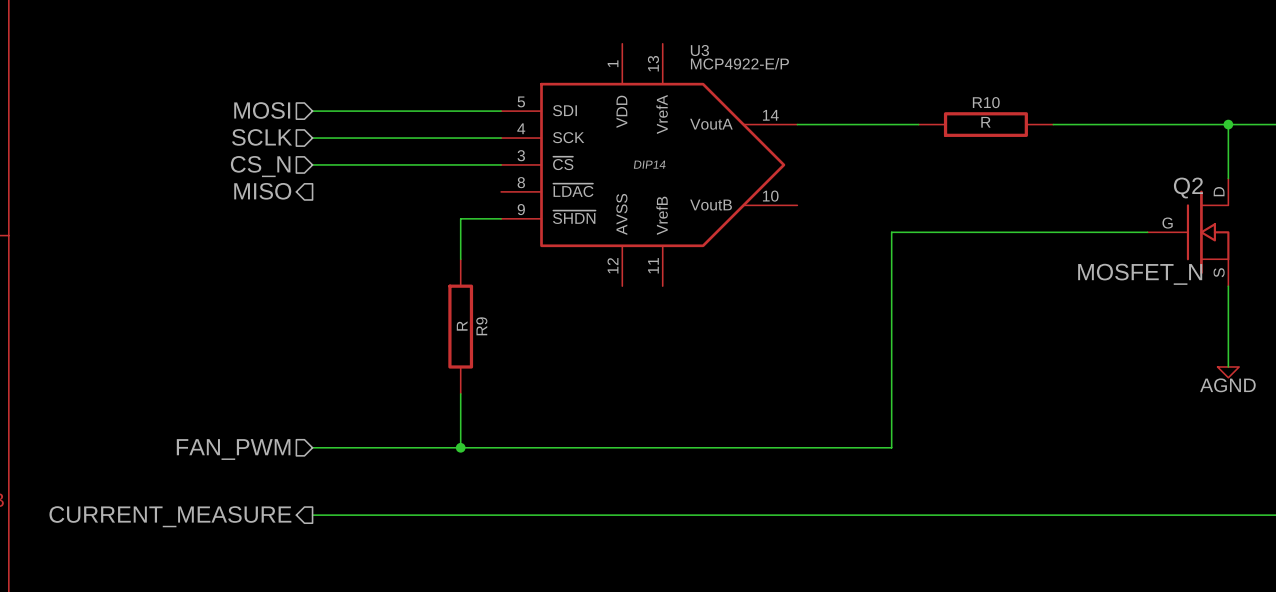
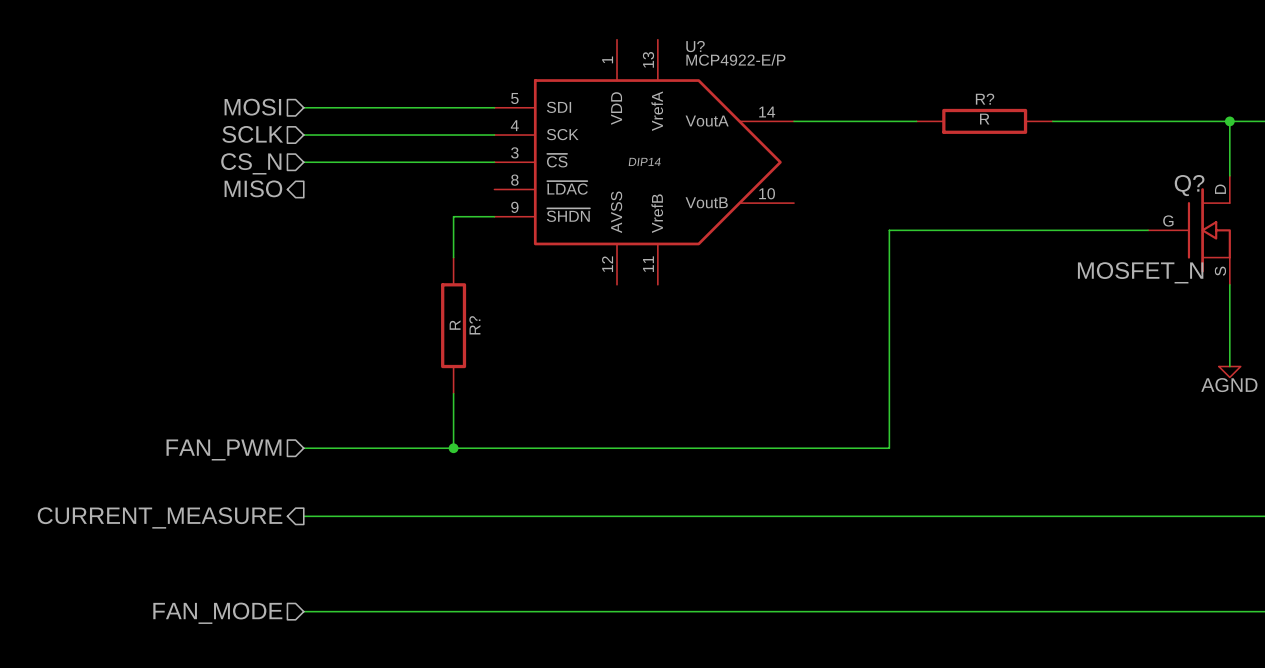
U3 name: U3 (699, 50) -> U? (695, 46)
R10 name: R10 (986, 102) -> R? (985, 99)
Q2 name: Q2 (1188, 188) -> Q? (1189, 185)
R9 name: R9 (481, 326) -> R? (474, 325)

